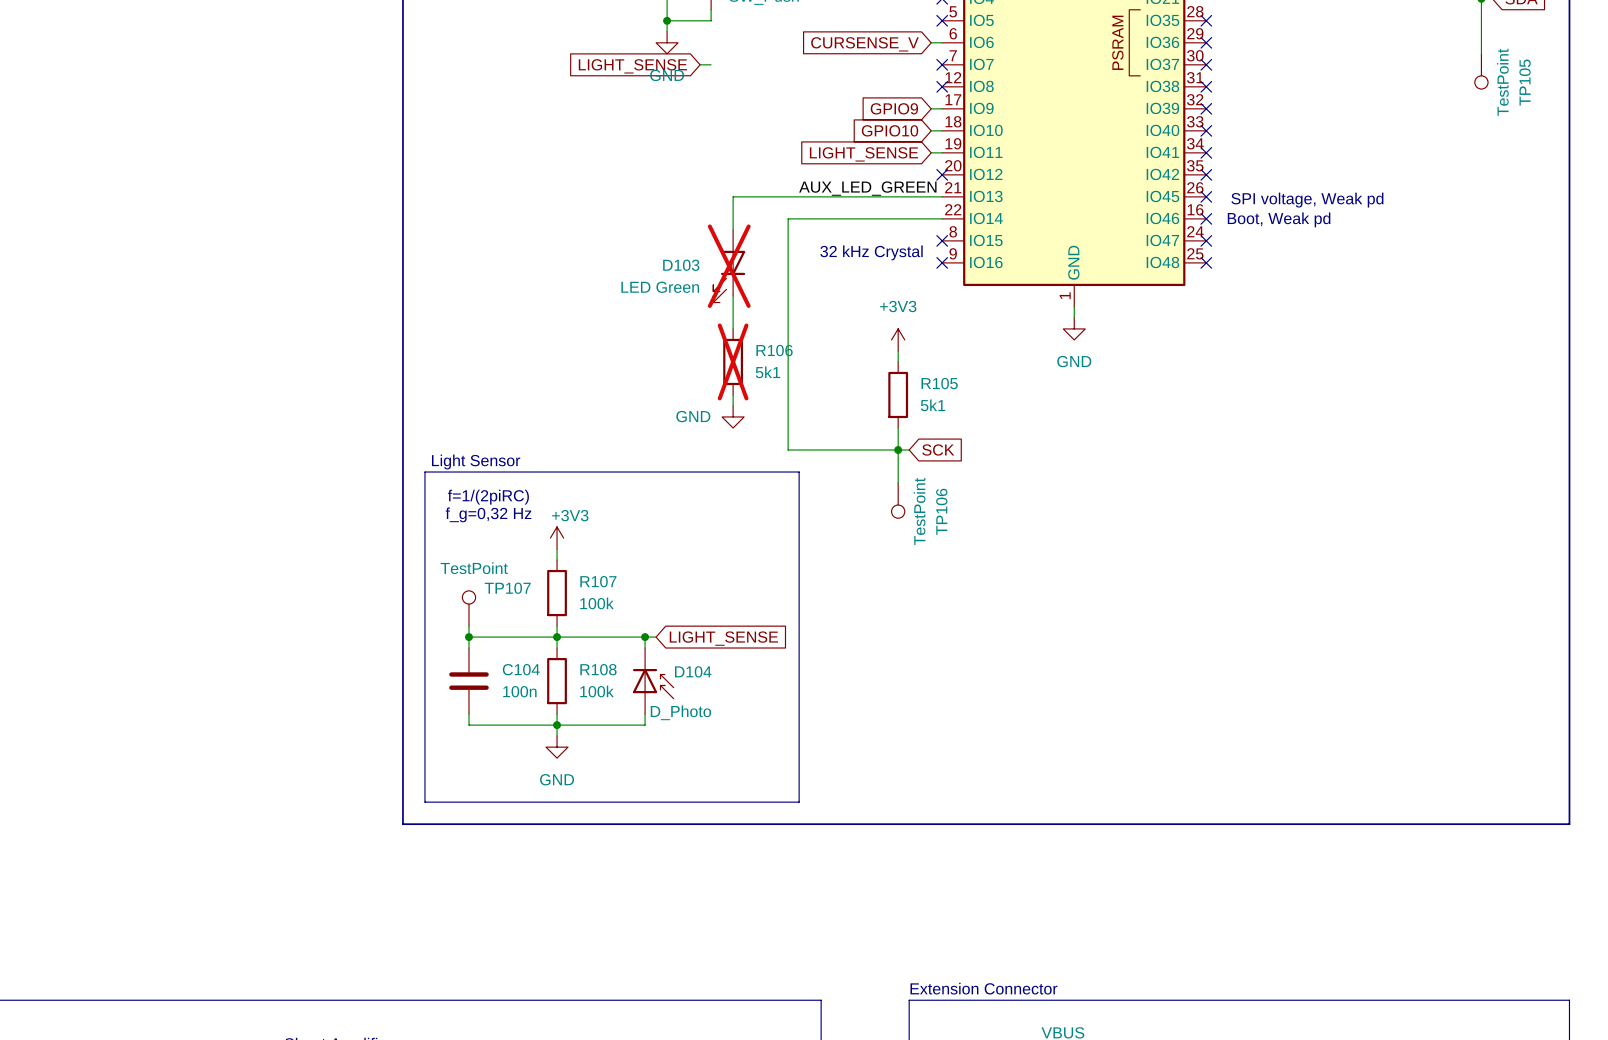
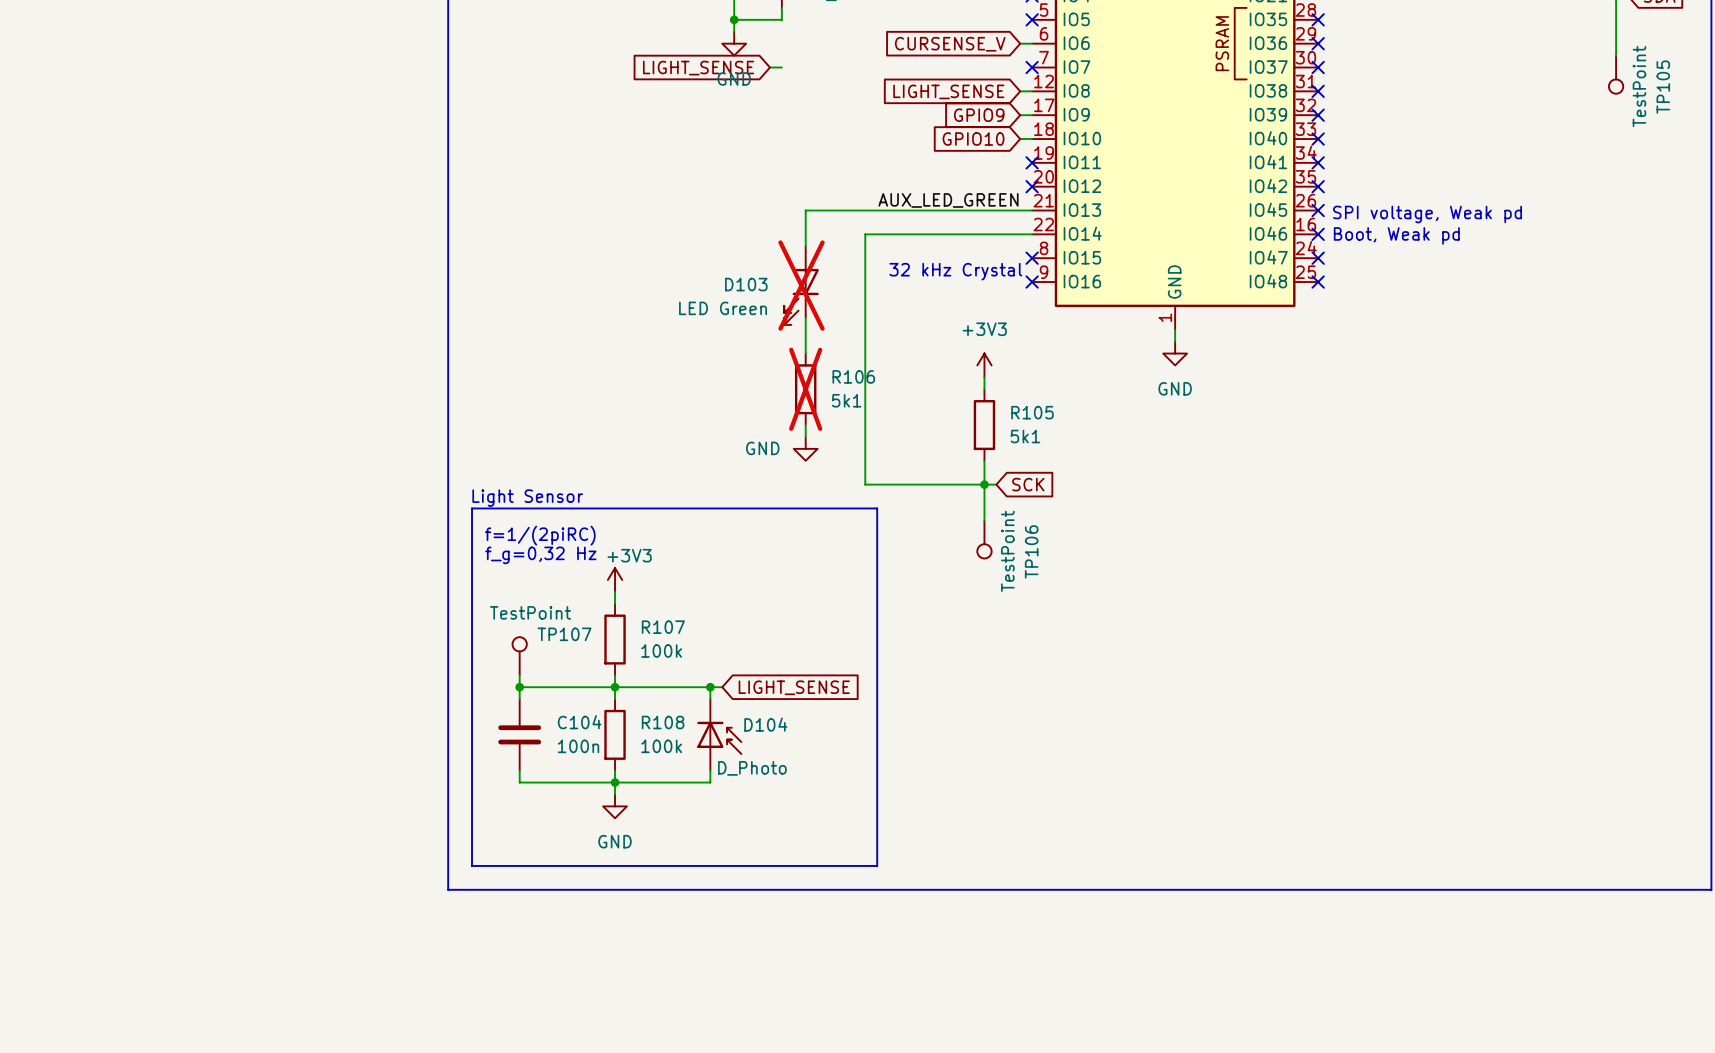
no-connect mark: (942, 86) -> none
wire: (931, 152) (942, 152) -> (1020, 91) (1032, 91)
no-connect mark: none -> (1032, 162)
global label position: LIGHT_SENSE (864, 154) -> LIGHT_SENSE (948, 91)

